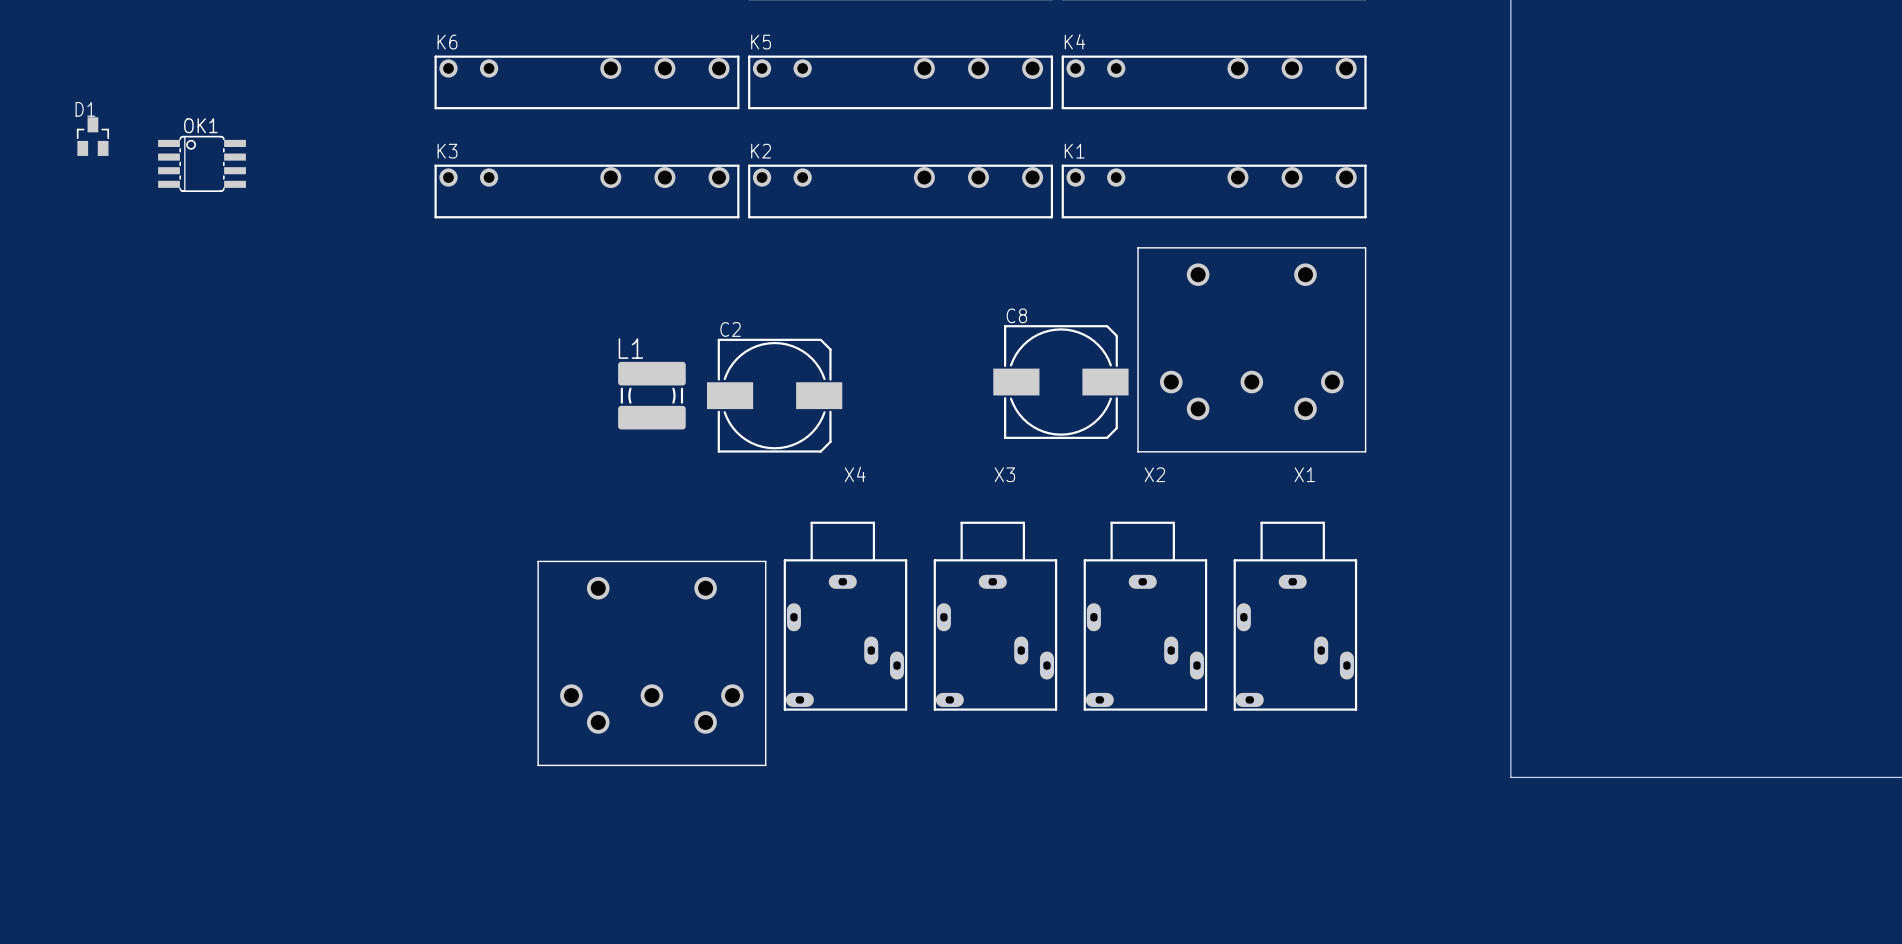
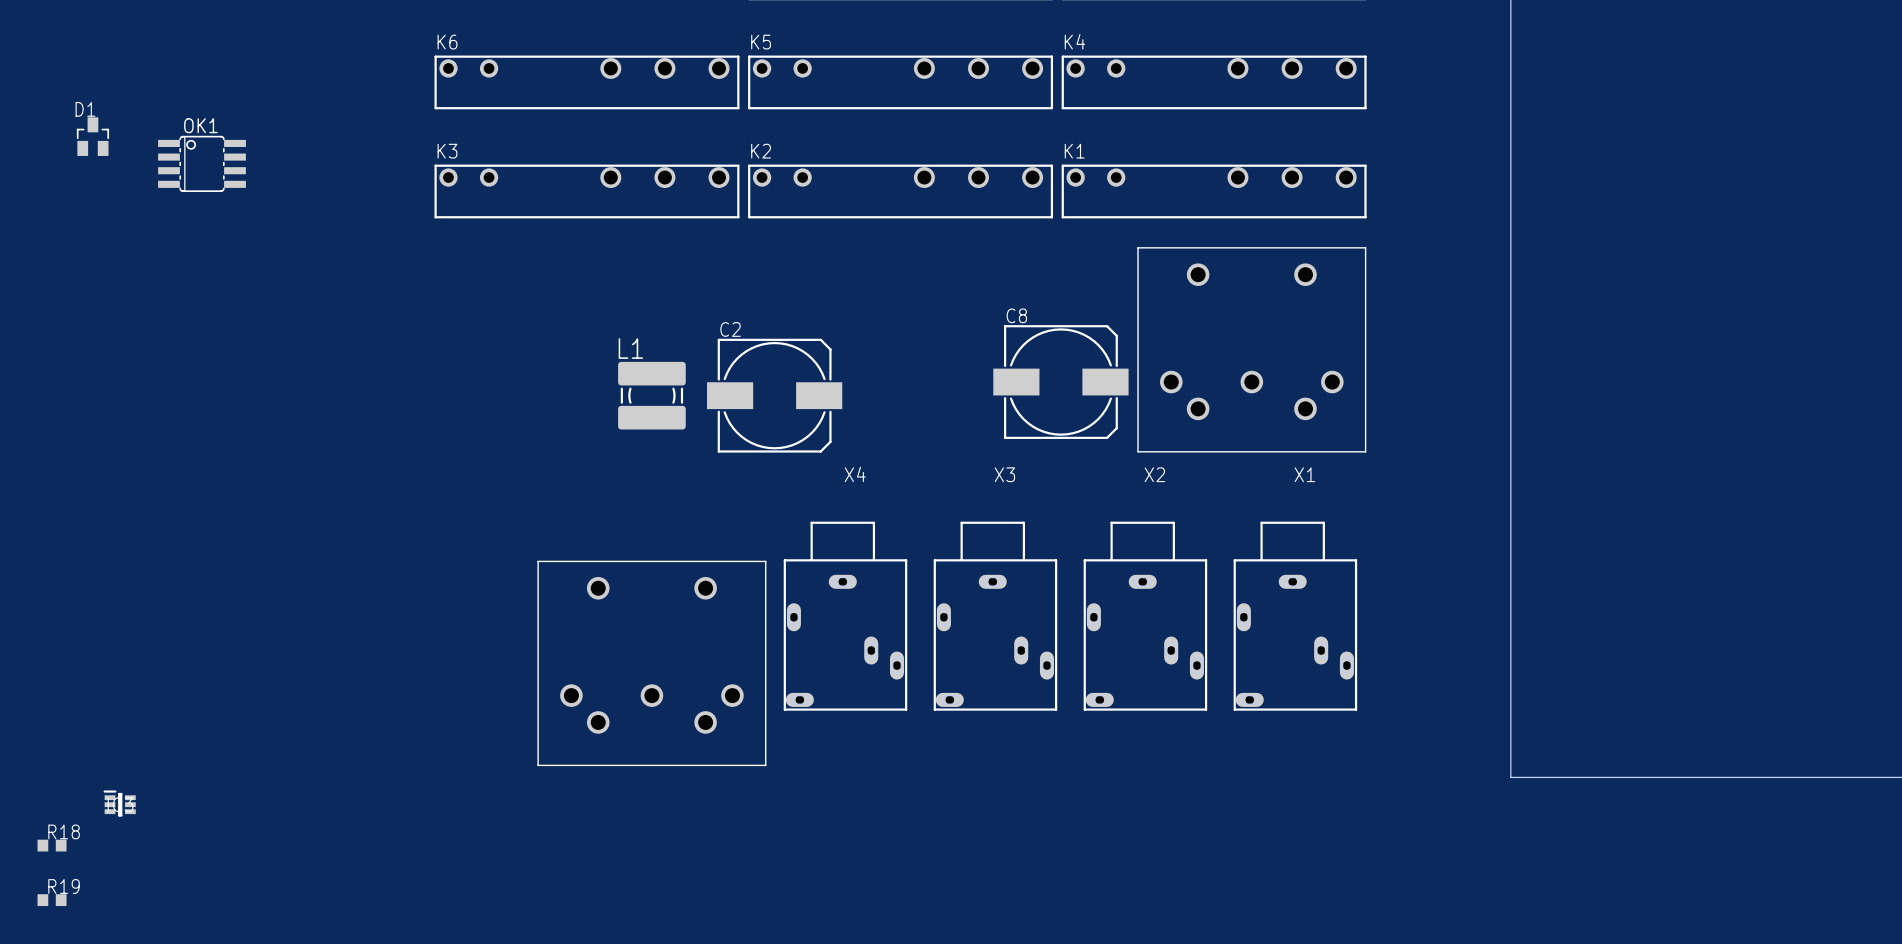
part: none -> (119, 803)
R18: none -> (52, 845)
R19: none -> (52, 900)

